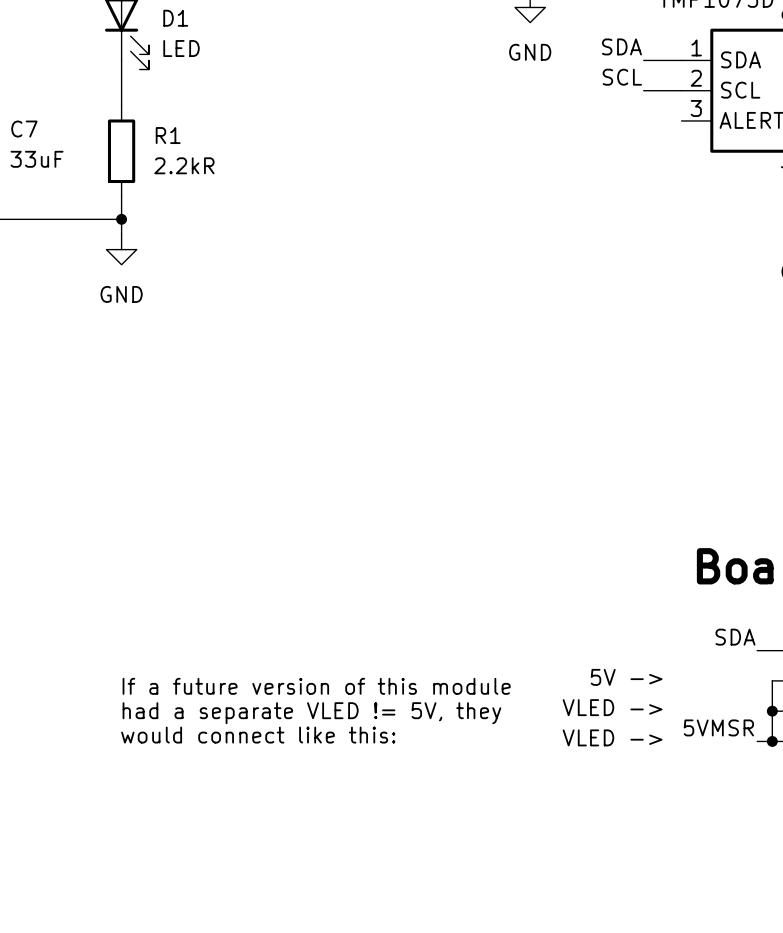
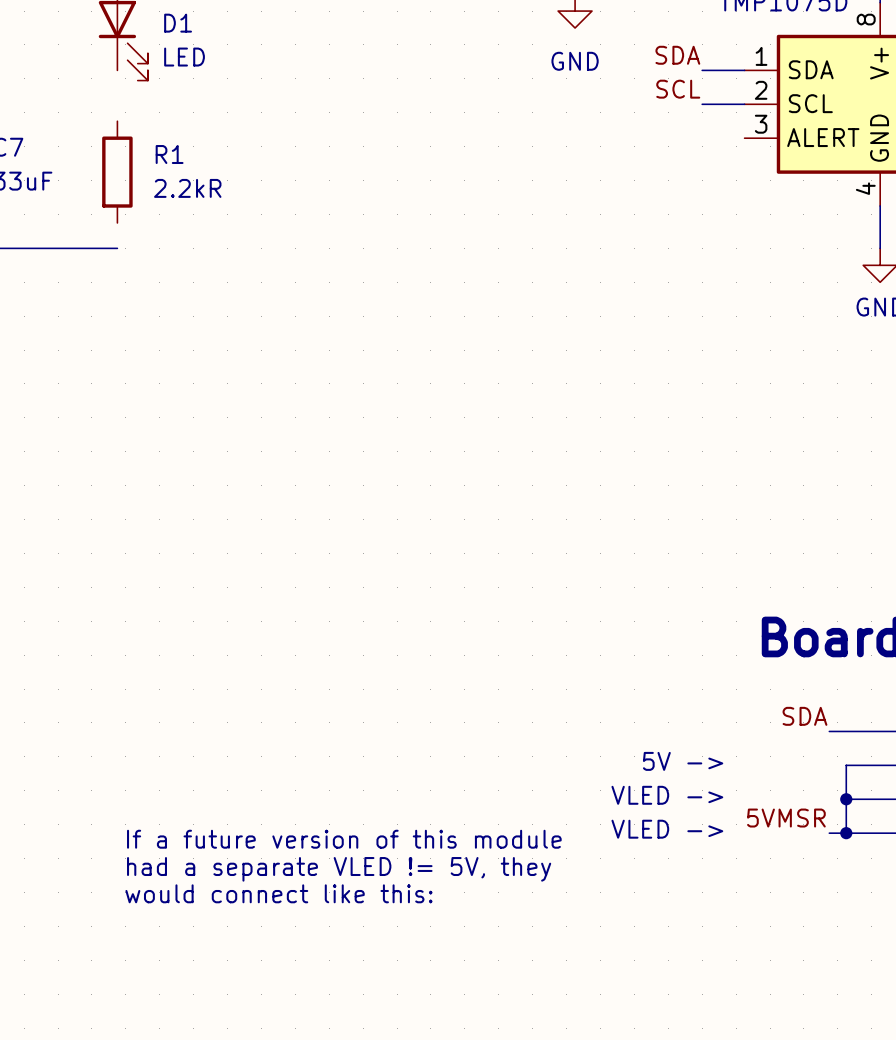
wire: (121, 60) (121, 105) -> none
wire: (121, 196) (121, 234) -> none
junction: (121, 219) -> none
power symbol: GND (121, 249) -> none
text position: If a future version of this module (316, 686) -> If a future version of this module (344, 839)
text position: had a separate VLED != 5V, they (311, 713) -> had a separate VLED != 5V, they (339, 869)
text position: would connect like this: (258, 735) -> would connect like this: (278, 893)

